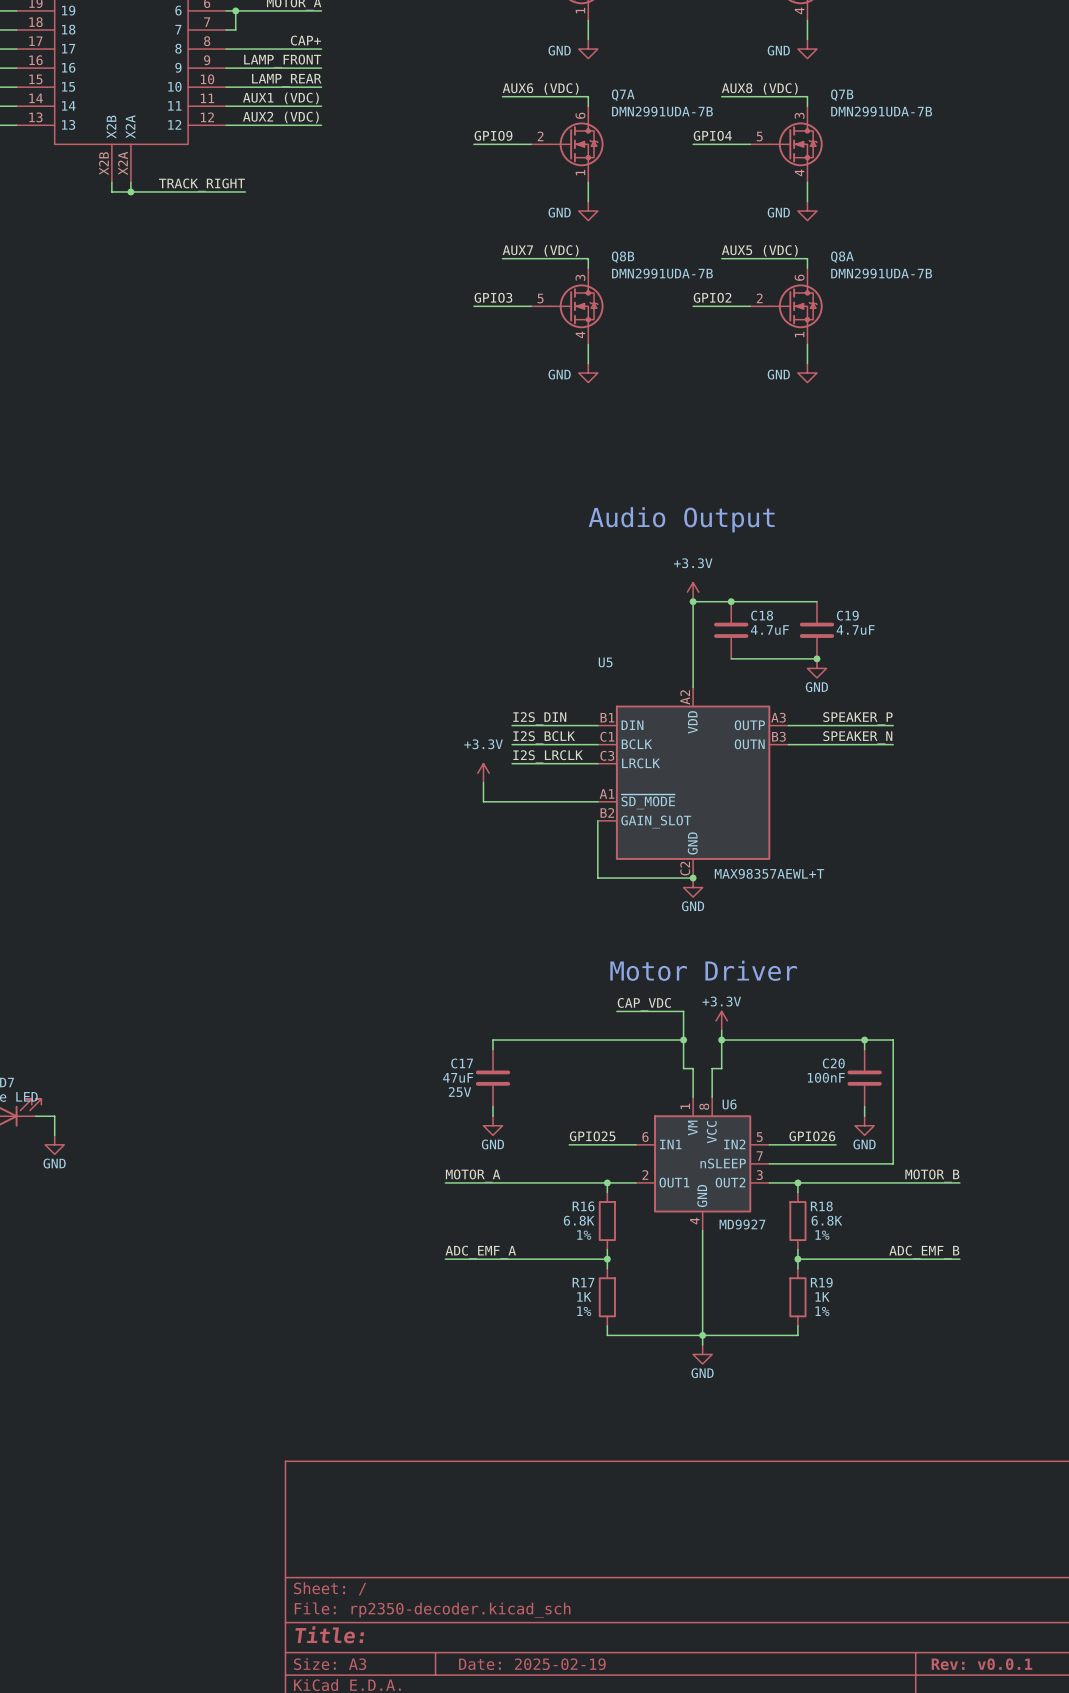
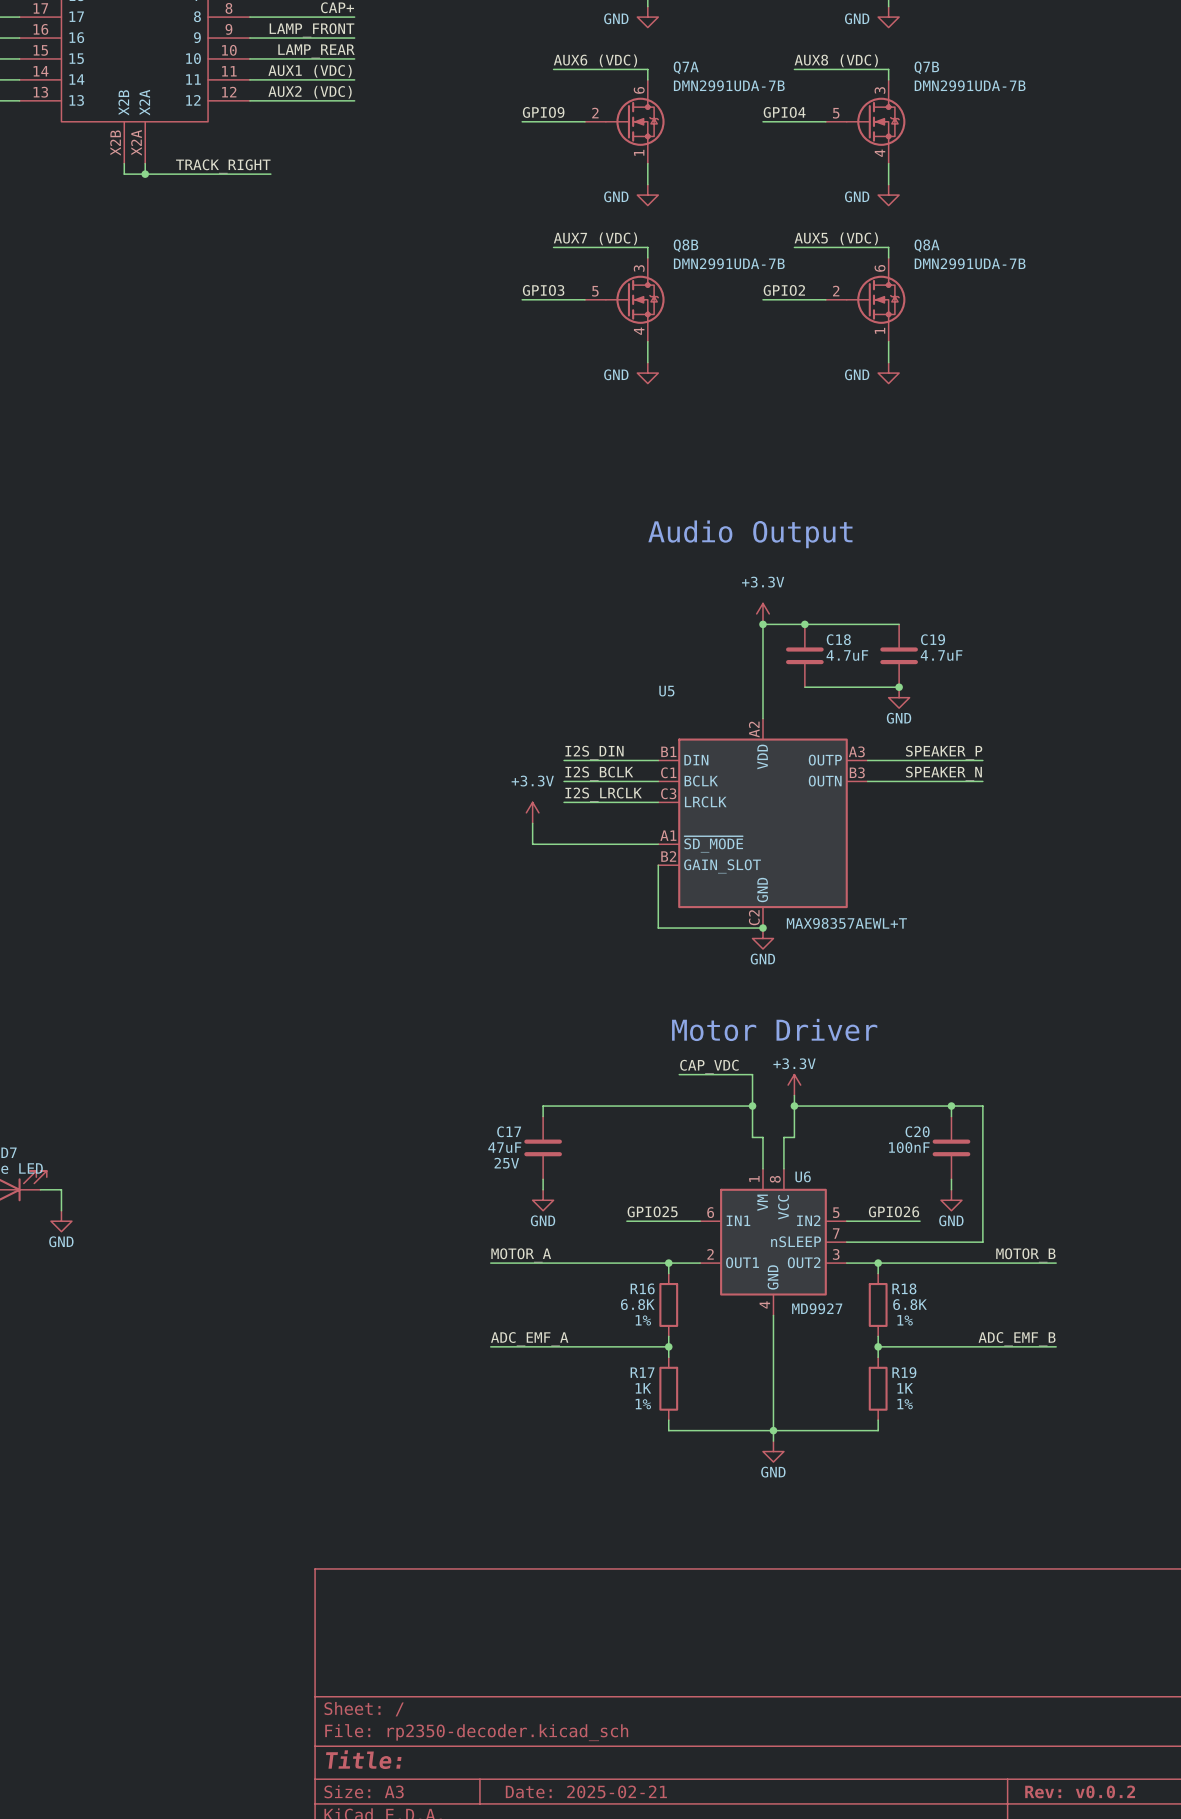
title block: Date: 2025-02-19 (532, 1664) -> Date: 2025-02-21 (586, 1791)
title block: Rev: v0.0.1 (981, 1664) -> Rev: v0.0.2 (1080, 1791)

